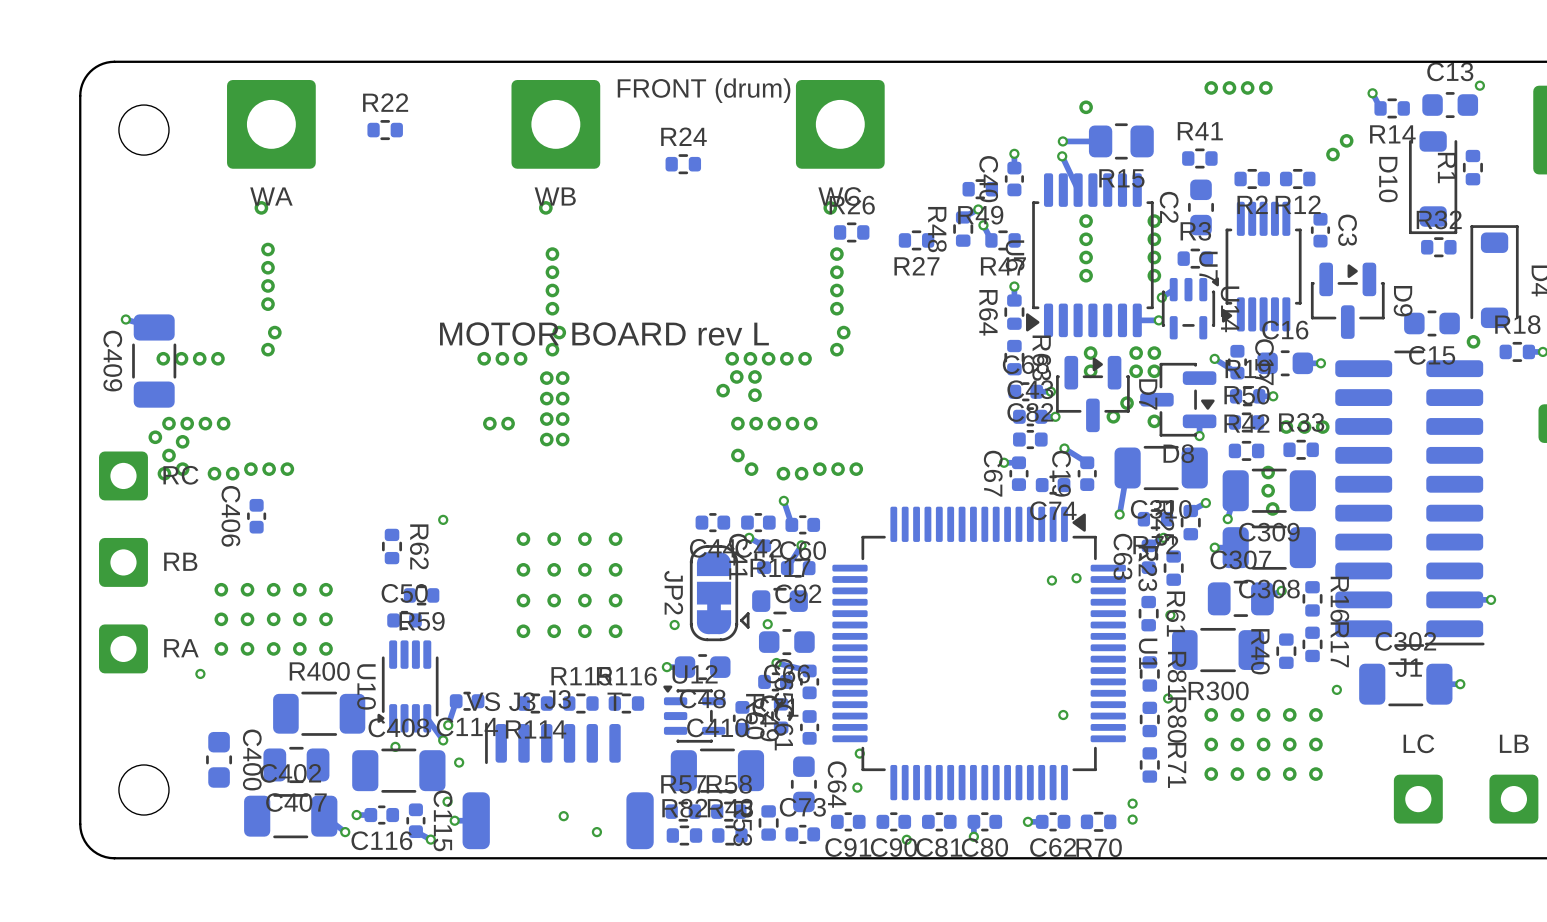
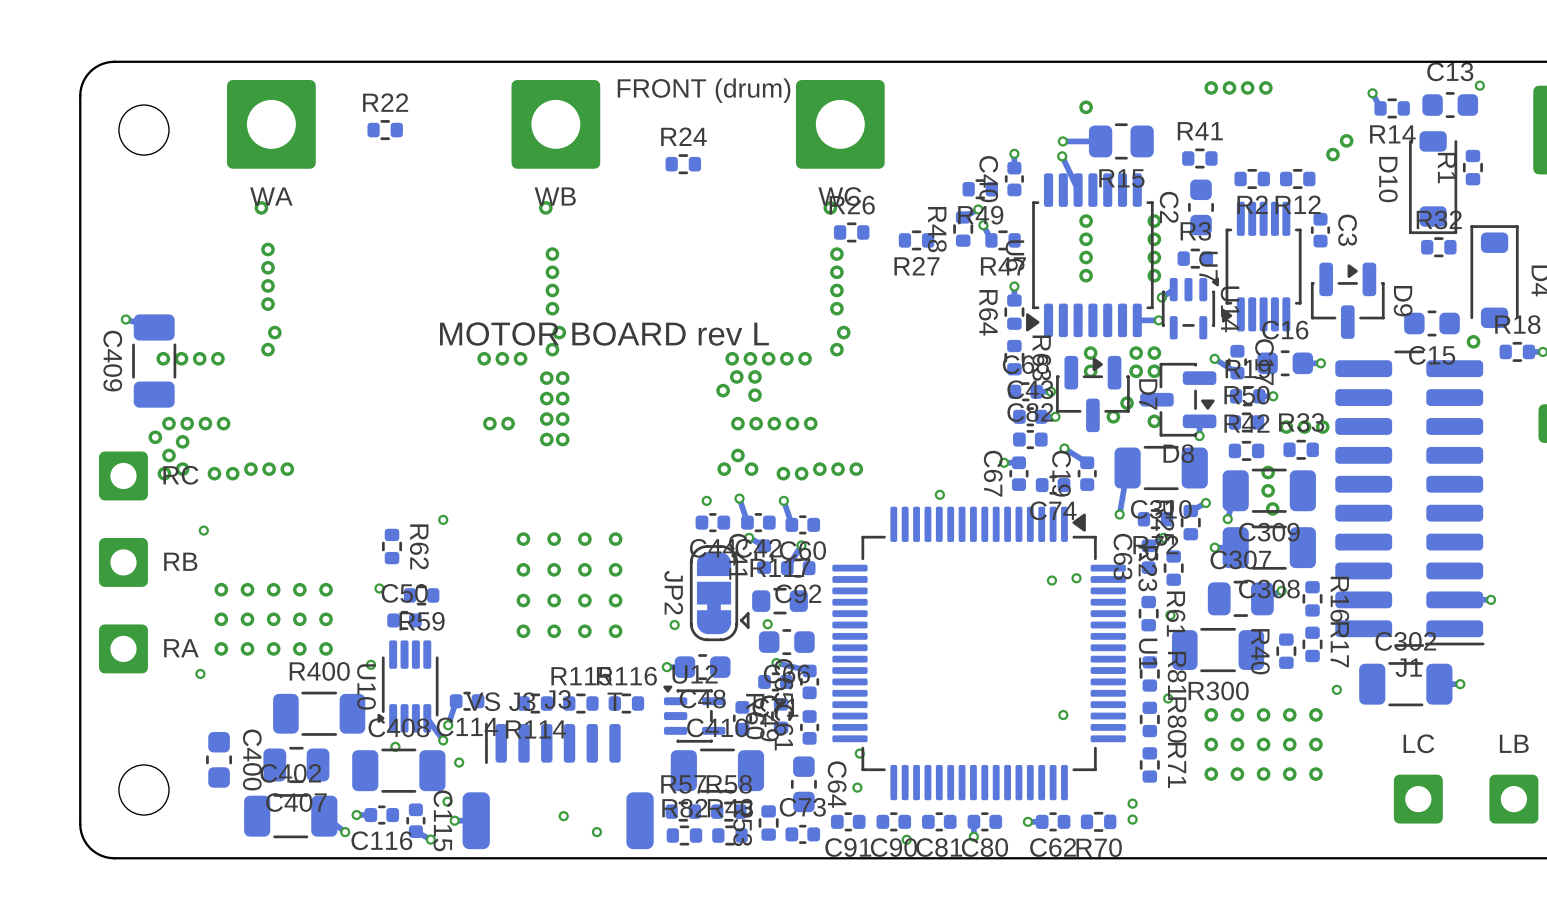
via: none -> (724, 469)
via: none -> (939, 494)
track: none -> (739, 498) (747, 522)
via: none -> (739, 498)
via: none -> (706, 500)
C406: (256, 516) -> none
via: none -> (203, 530)
via: none -> (379, 588)
via: none -> (370, 664)

